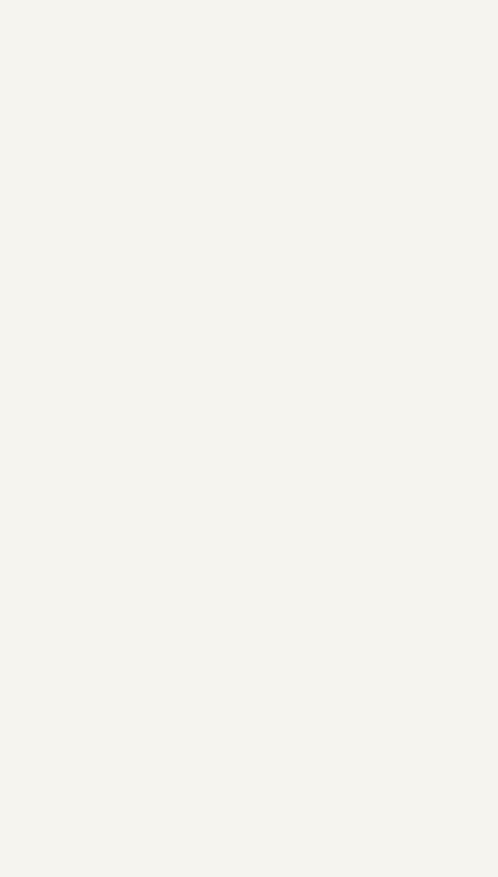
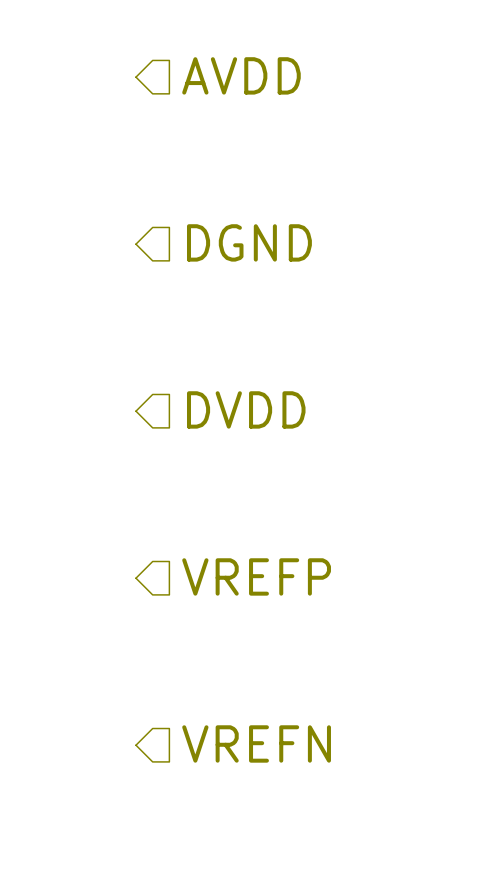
hierarchical label: none -> AVDD (241, 75)
hierarchical label: none -> DGND (249, 242)
hierarchical label: none -> DVDD (246, 409)
hierarchical label: none -> VREFP (256, 576)
hierarchical label: none -> VREFN (256, 743)

